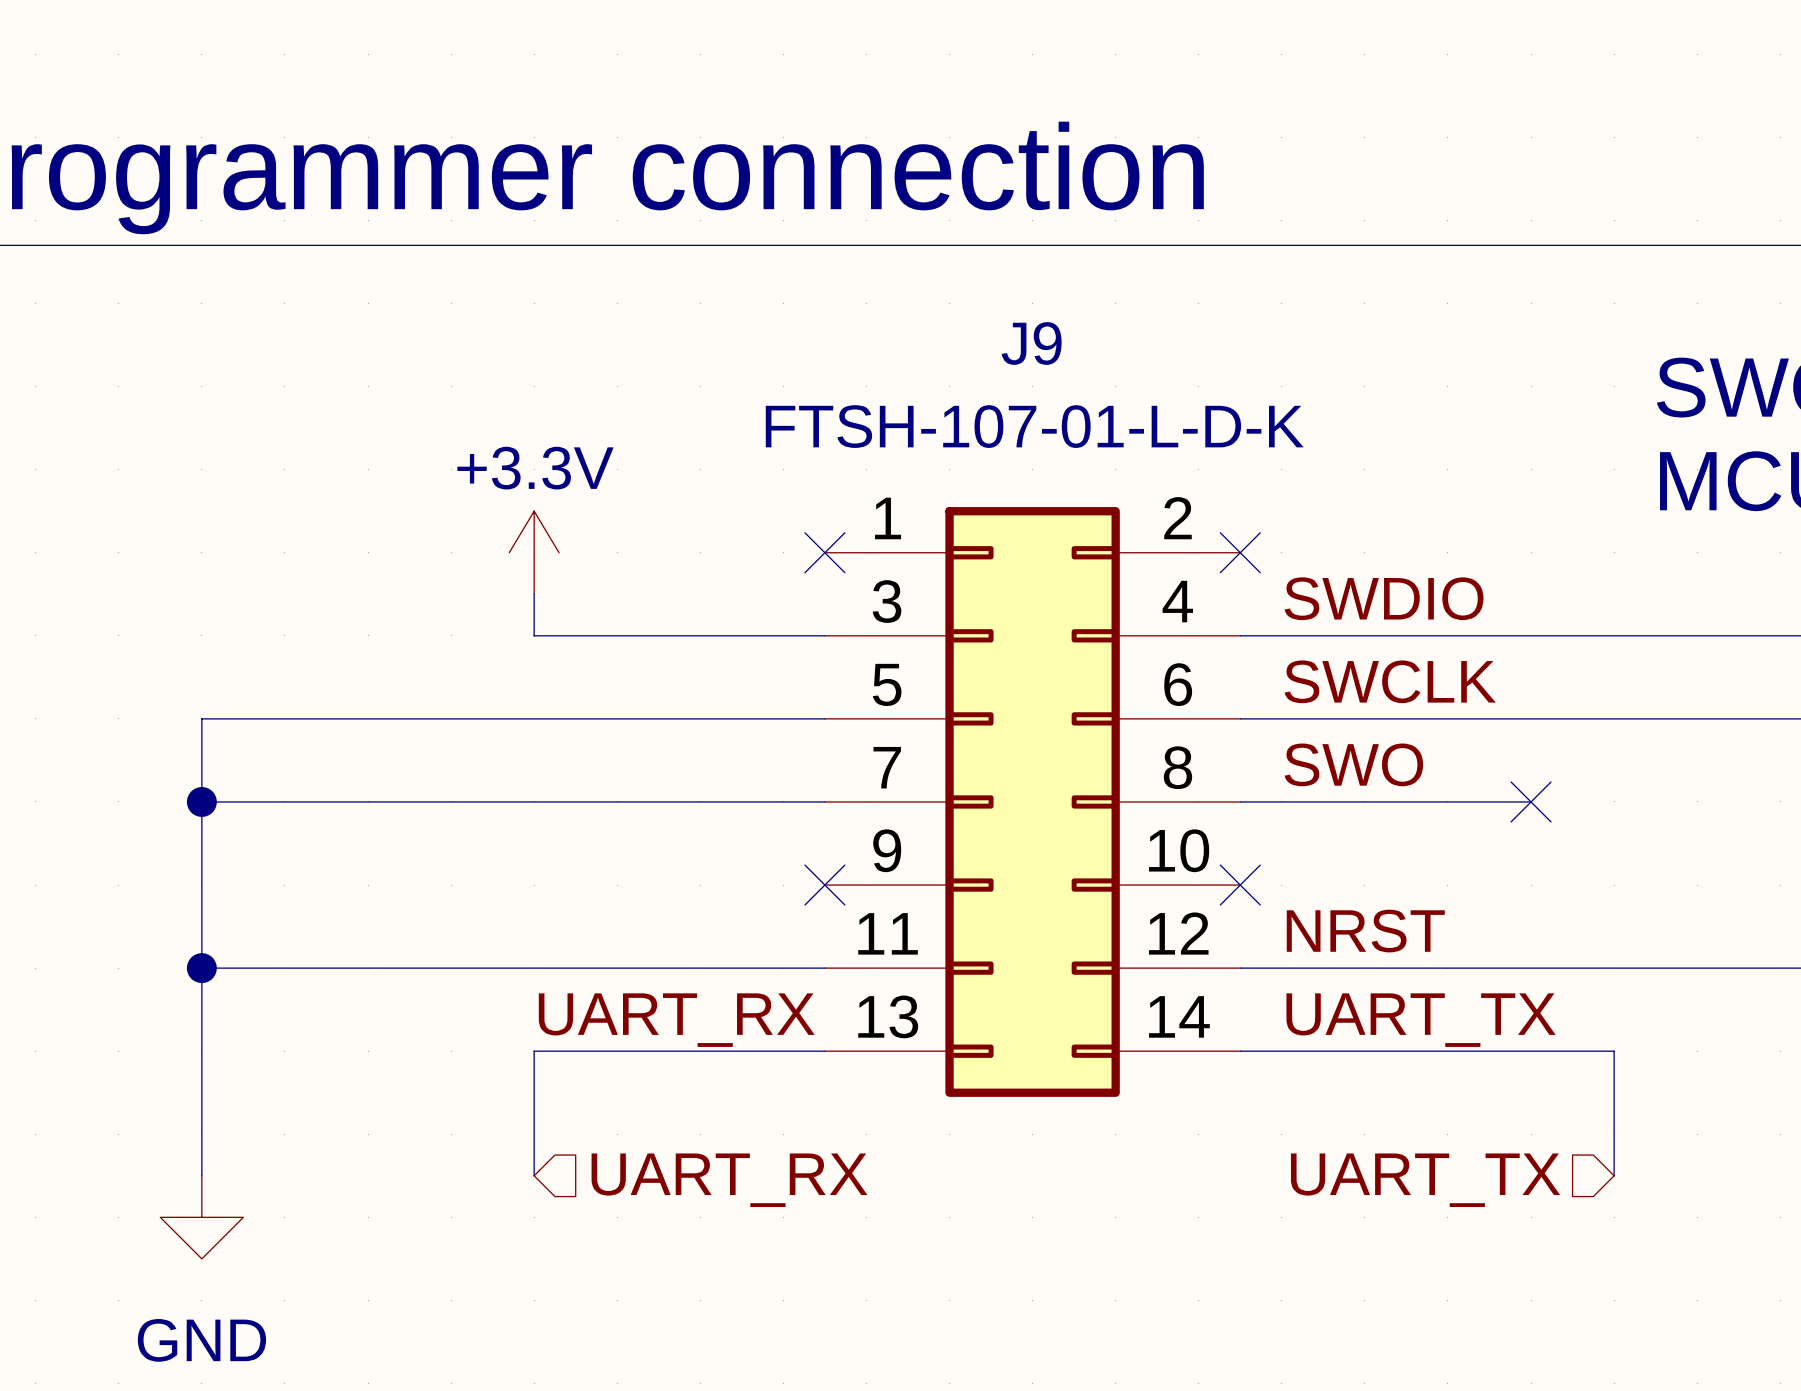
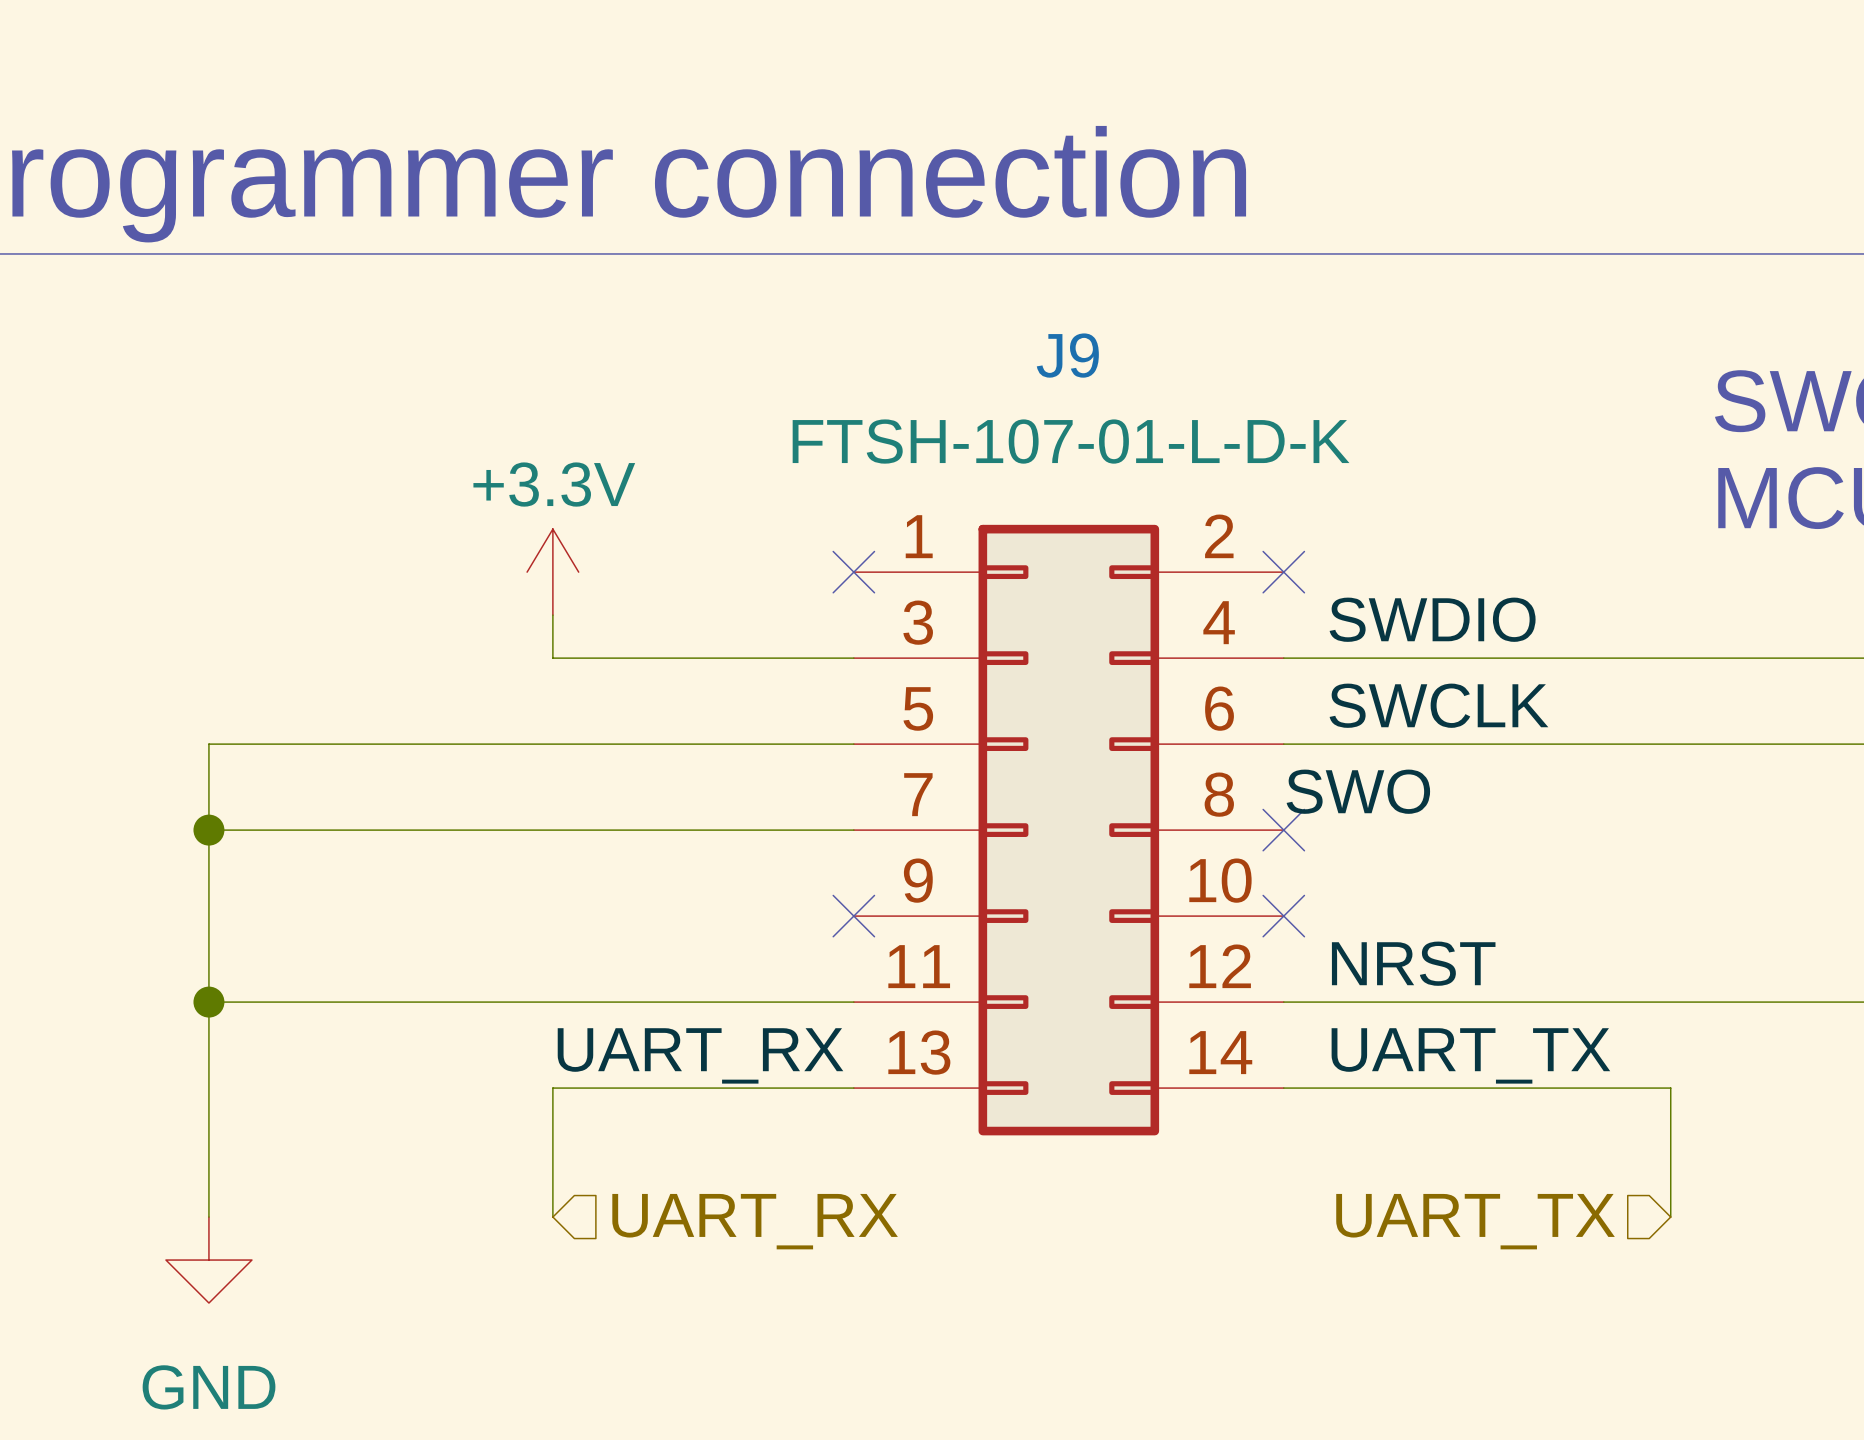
label position: SWO (1353, 764) -> SWO (1358, 791)
wire: (1240, 801) (1531, 801) -> none
no-connect mark: none -> (1283, 830)
no-connect mark: (1531, 801) -> none

